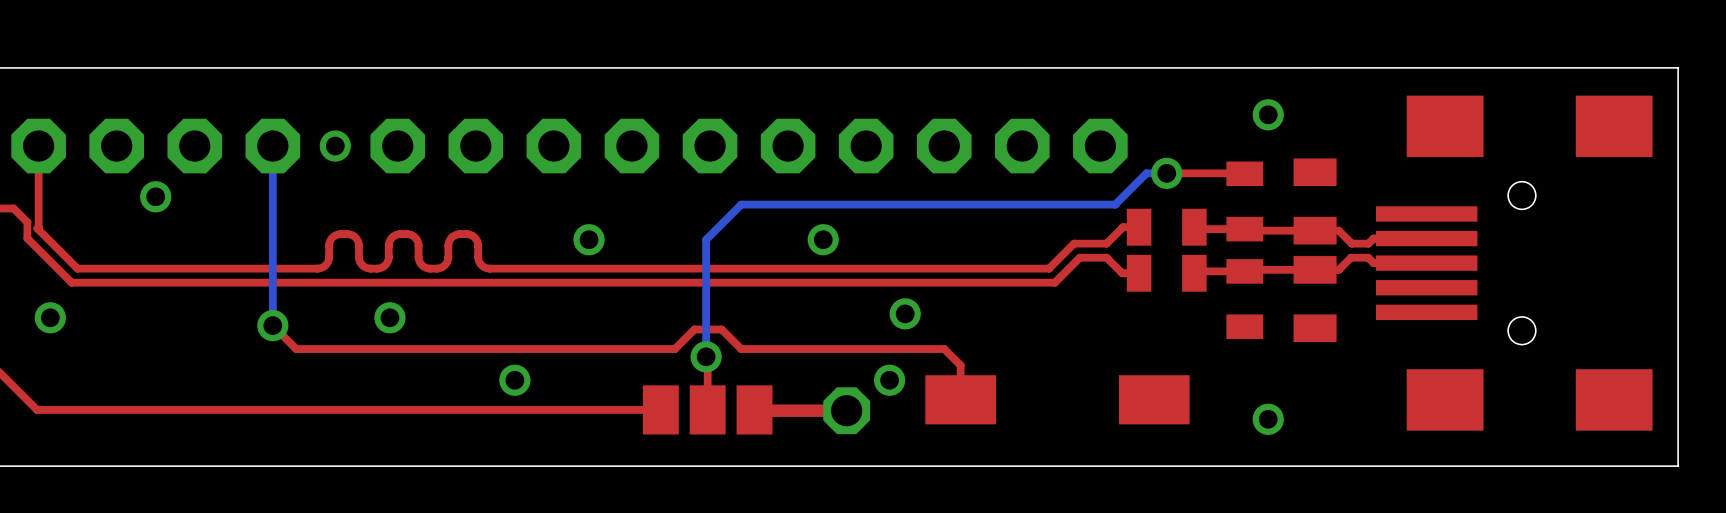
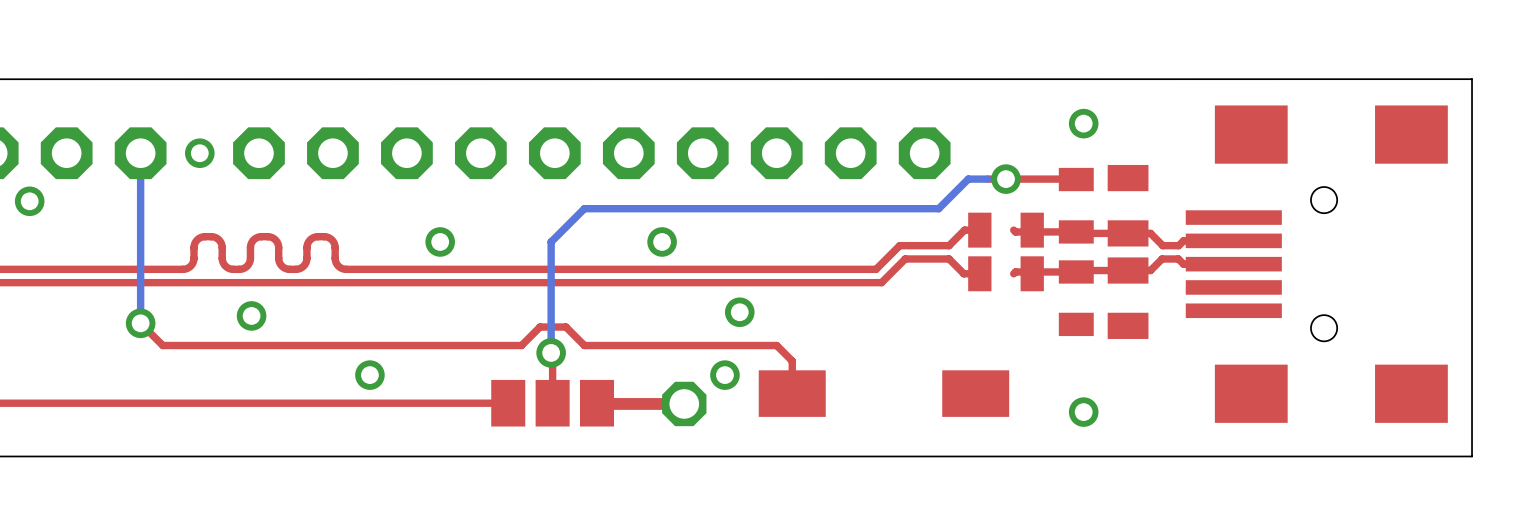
via position: (1166, 173) -> (1006, 179)
part position: (1244, 201) -> (1076, 205)
top track: (1139, 227) (1123, 227) (1106, 243) -> (979, 230) (964, 230) (949, 245) (930, 245)
part position: (1166, 227) -> (1006, 230)
top track: (1106, 257) (1122, 273) (1139, 273) -> (930, 258) (949, 258) (963, 273) (979, 273)
part position: (1166, 273) -> (1006, 273)
part position: (1244, 299) -> (1076, 298)

